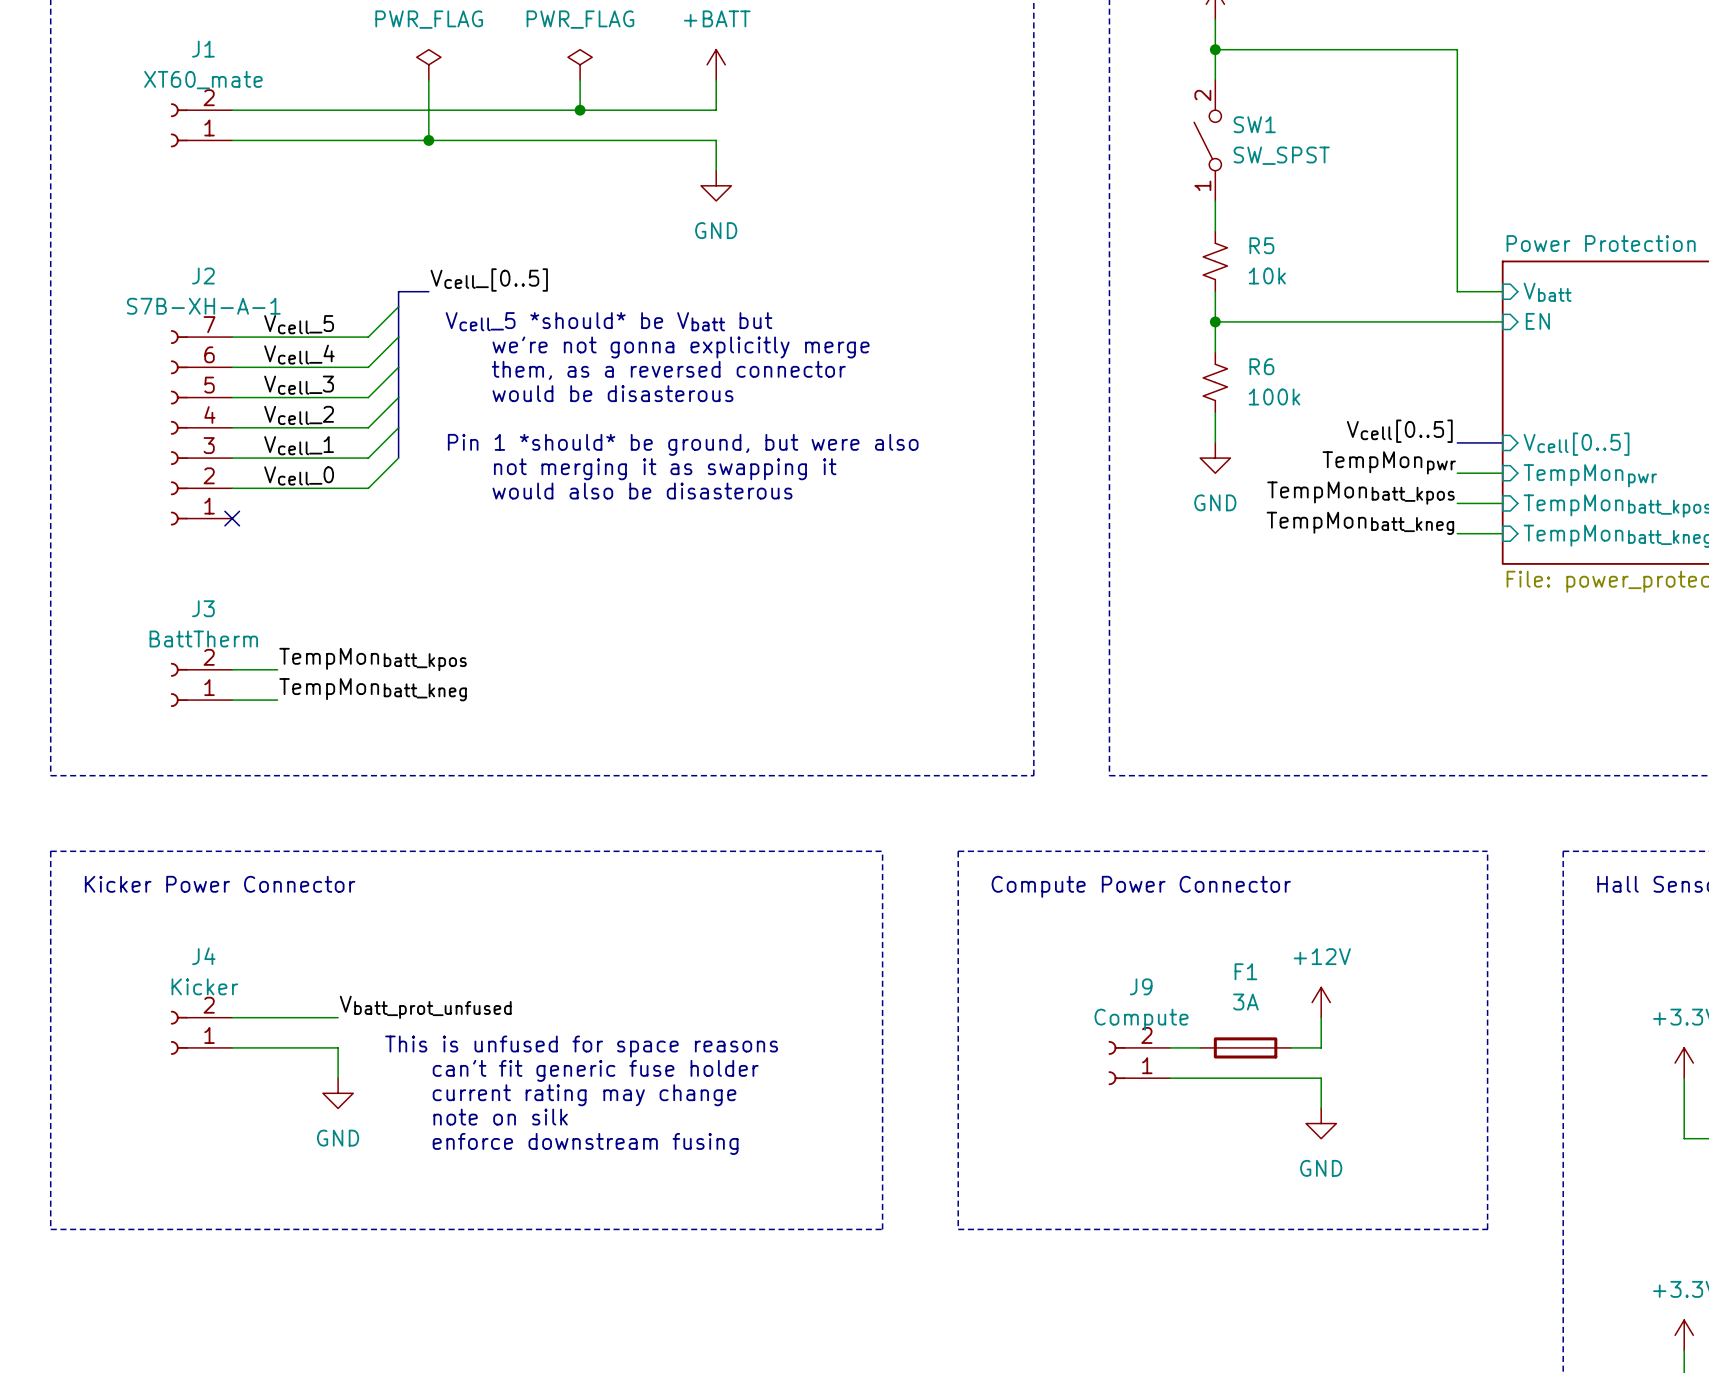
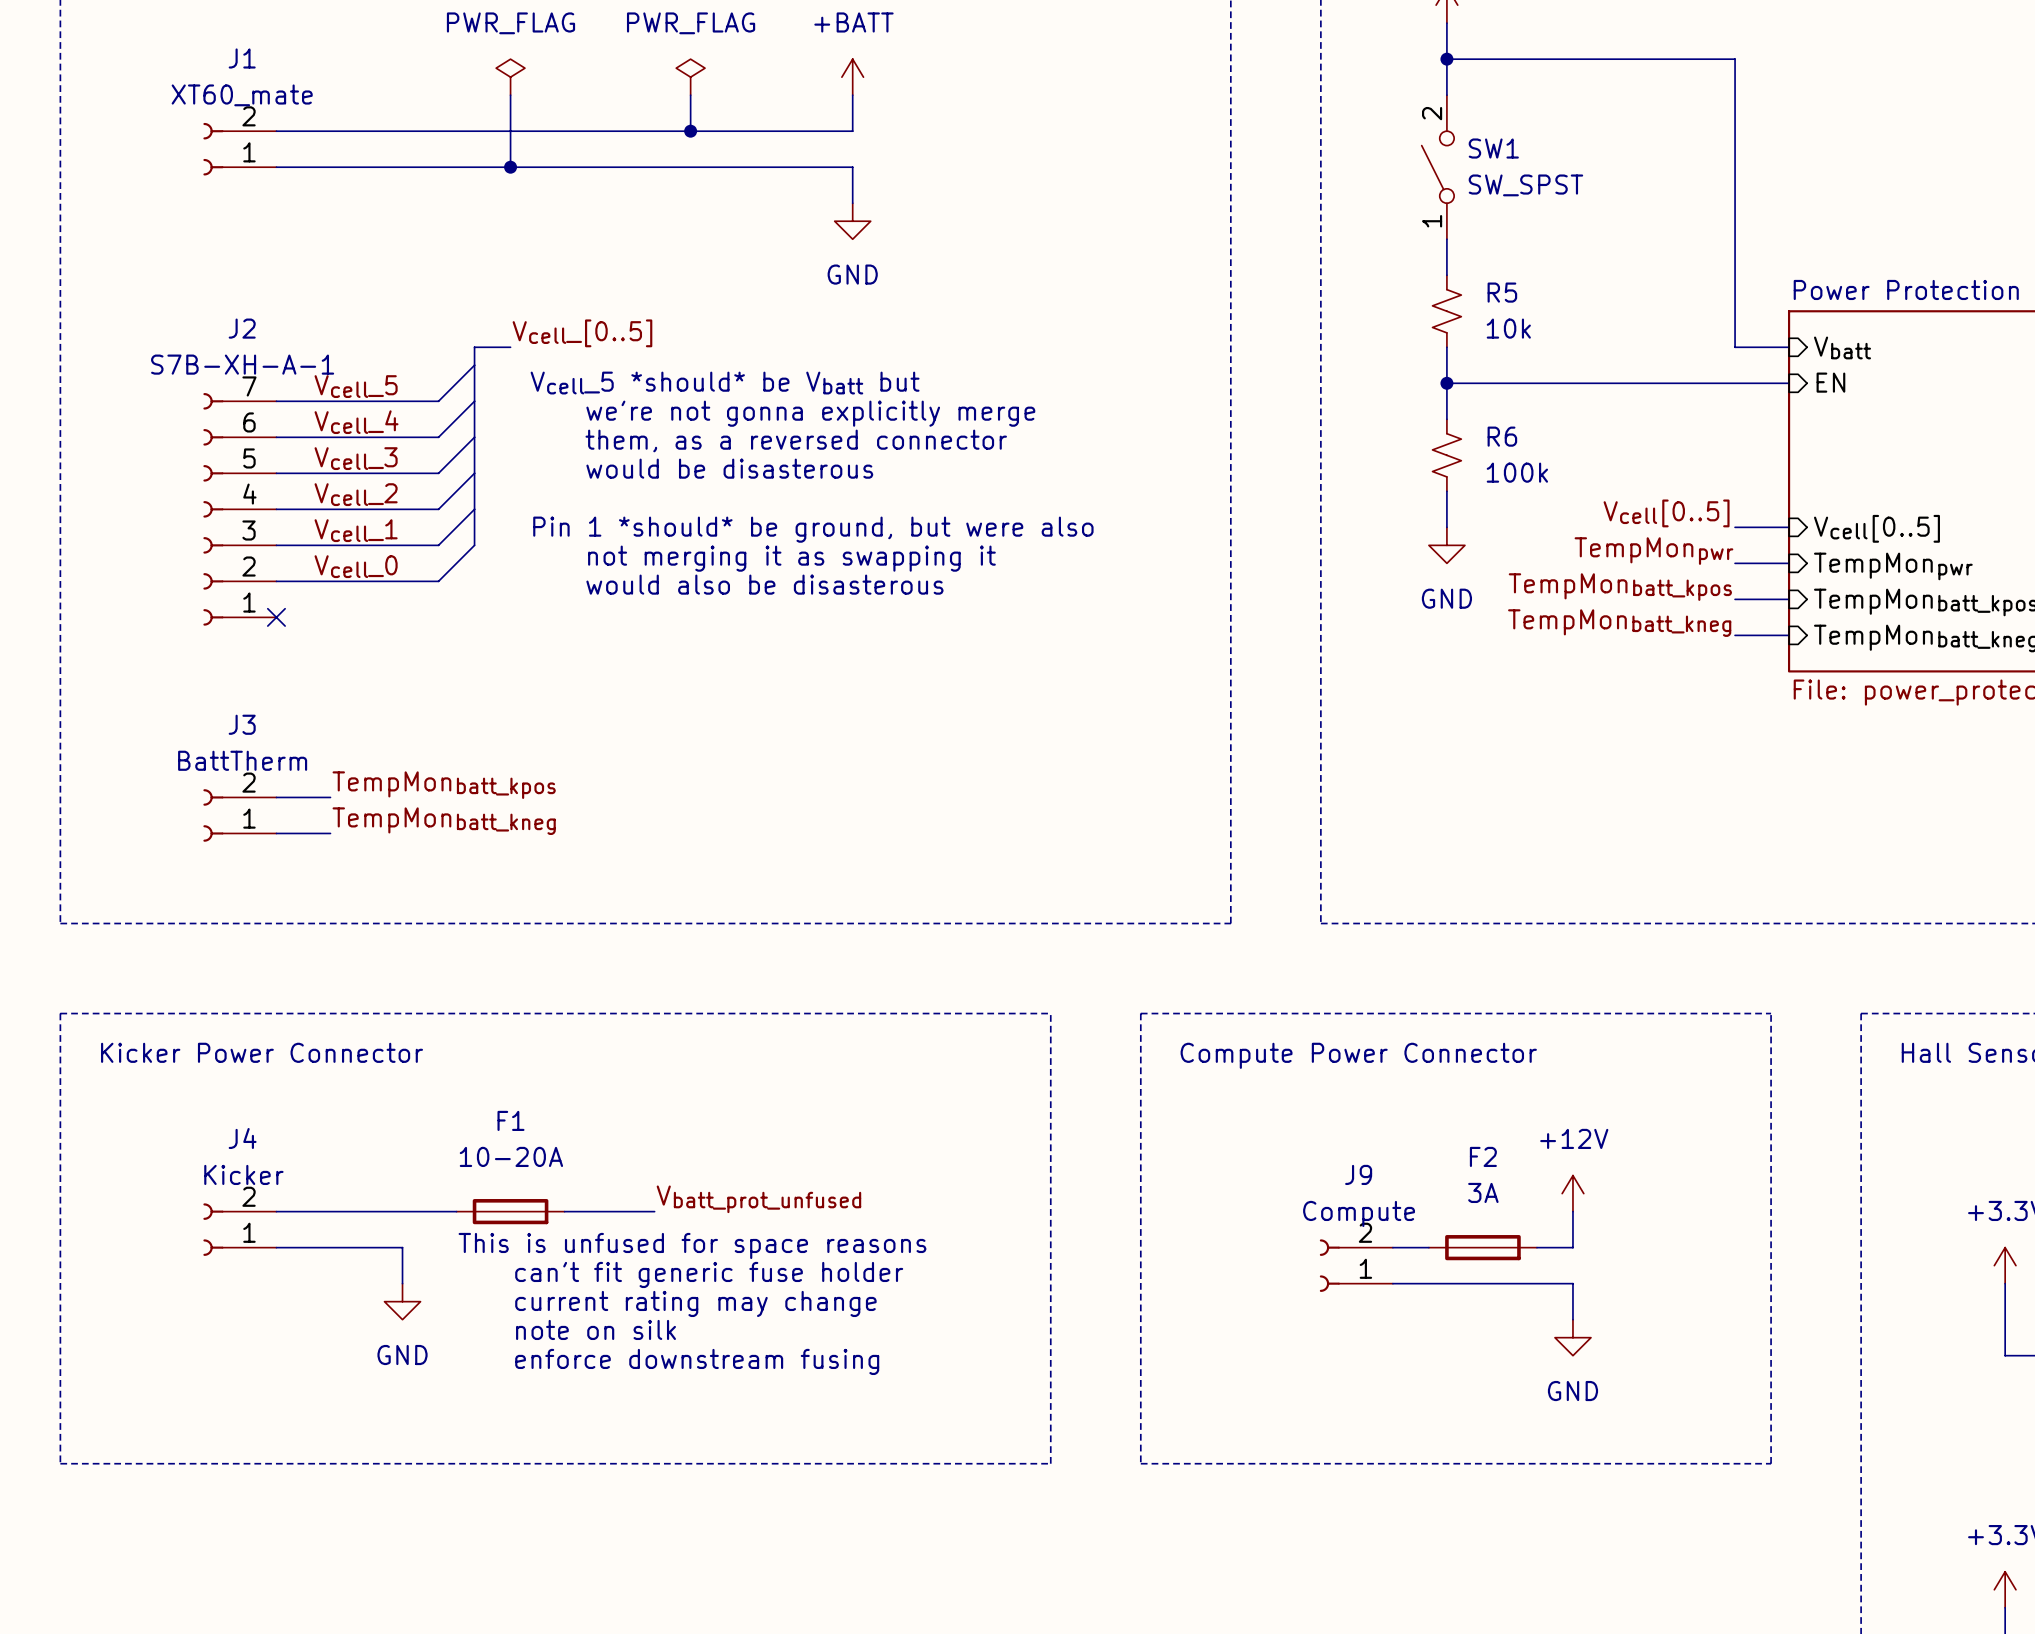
F1 name: F1 (1245, 971) -> F2 (1483, 1156)
label position: Vbatt_prot_unfused (425, 1007) -> Vbatt_prot_unfused (758, 1199)
wire: none -> (402, 1211) (456, 1211)
F1: none -> 10-20A (510, 1211)
wire: none -> (564, 1211) (654, 1211)

